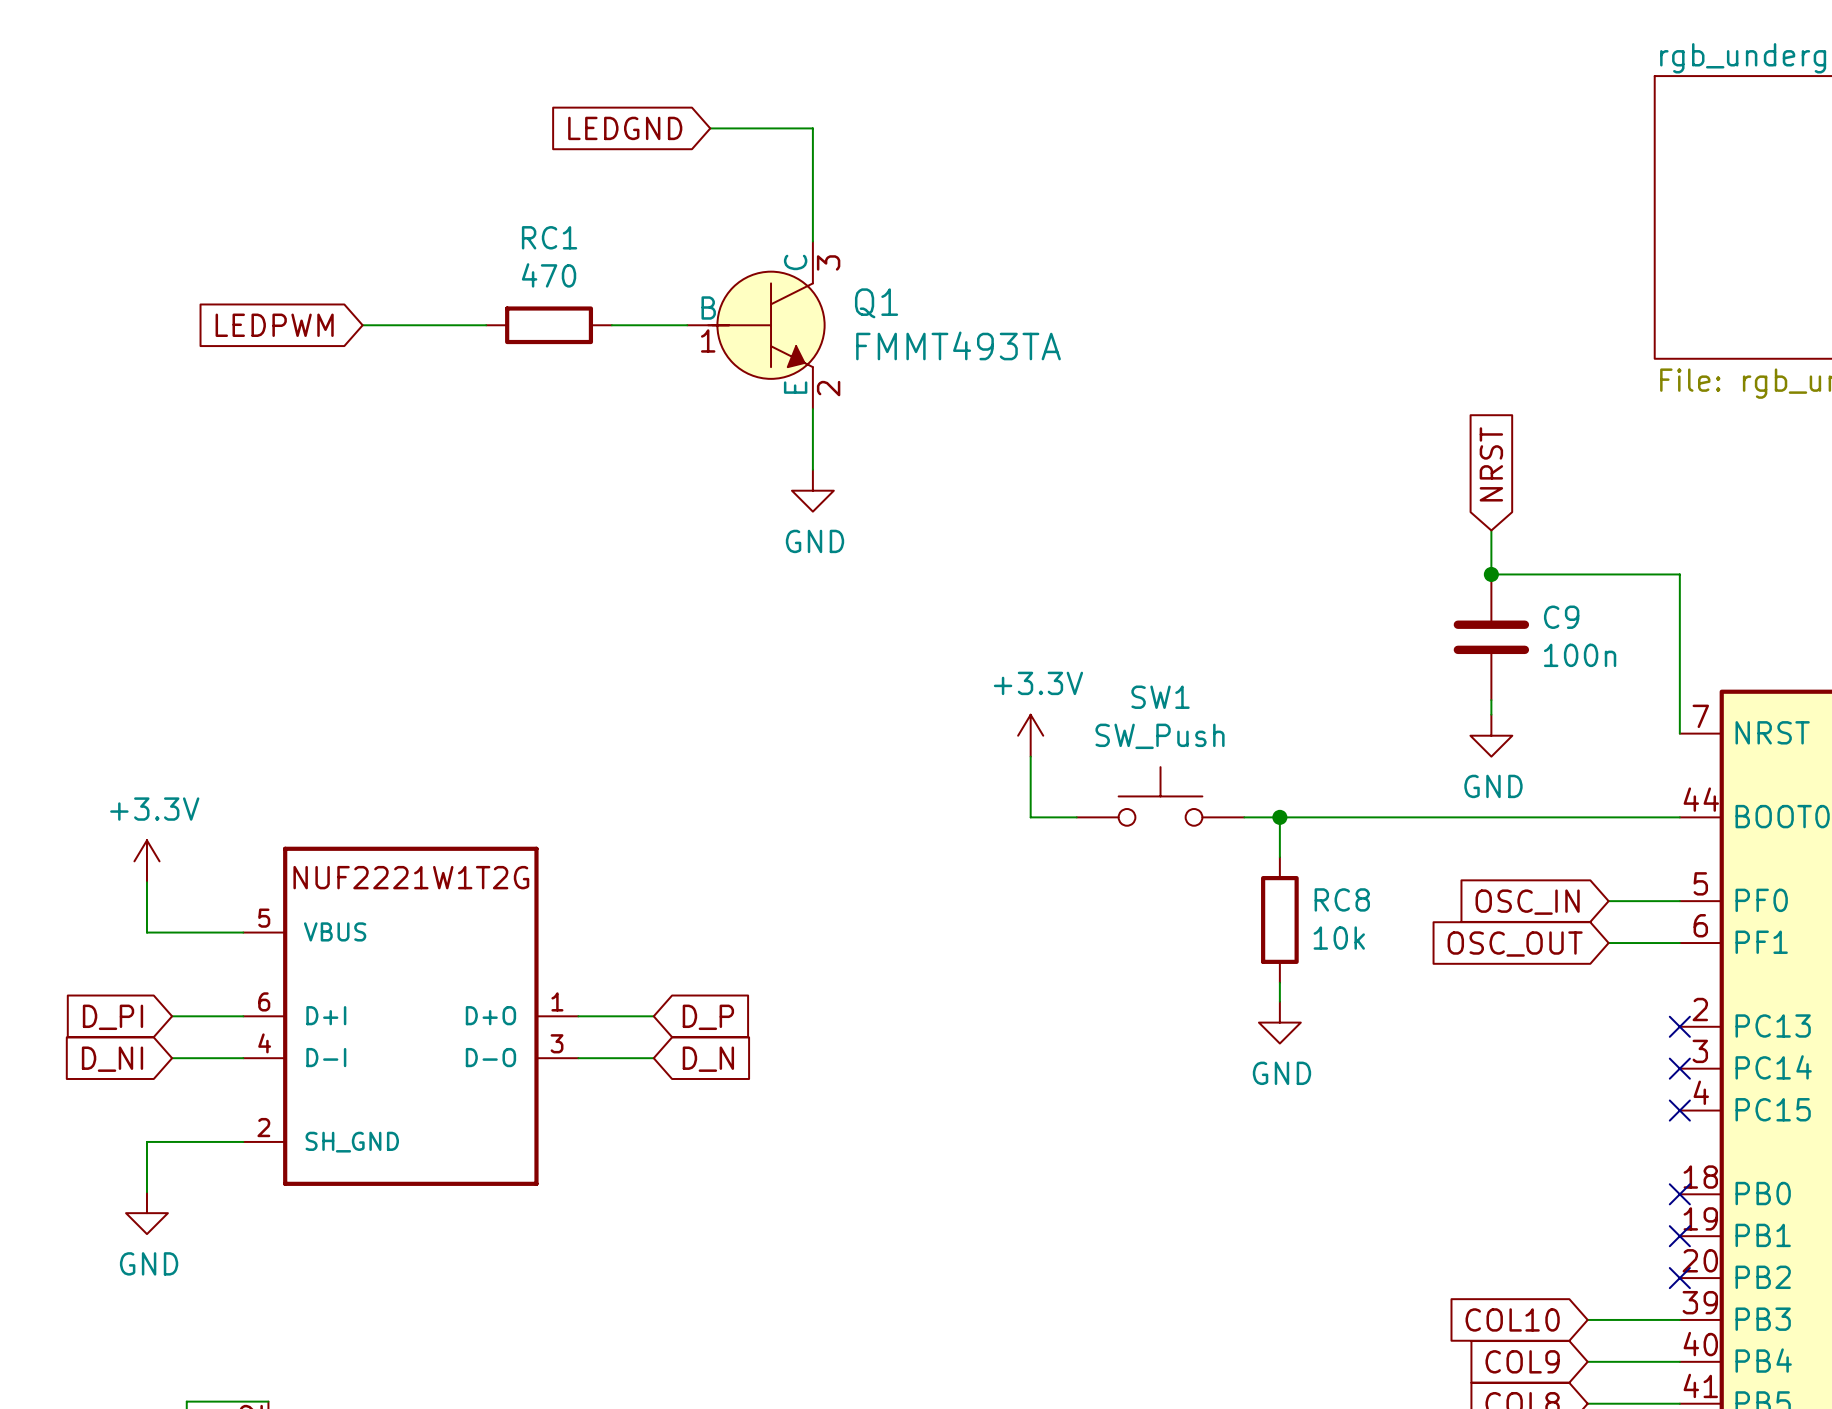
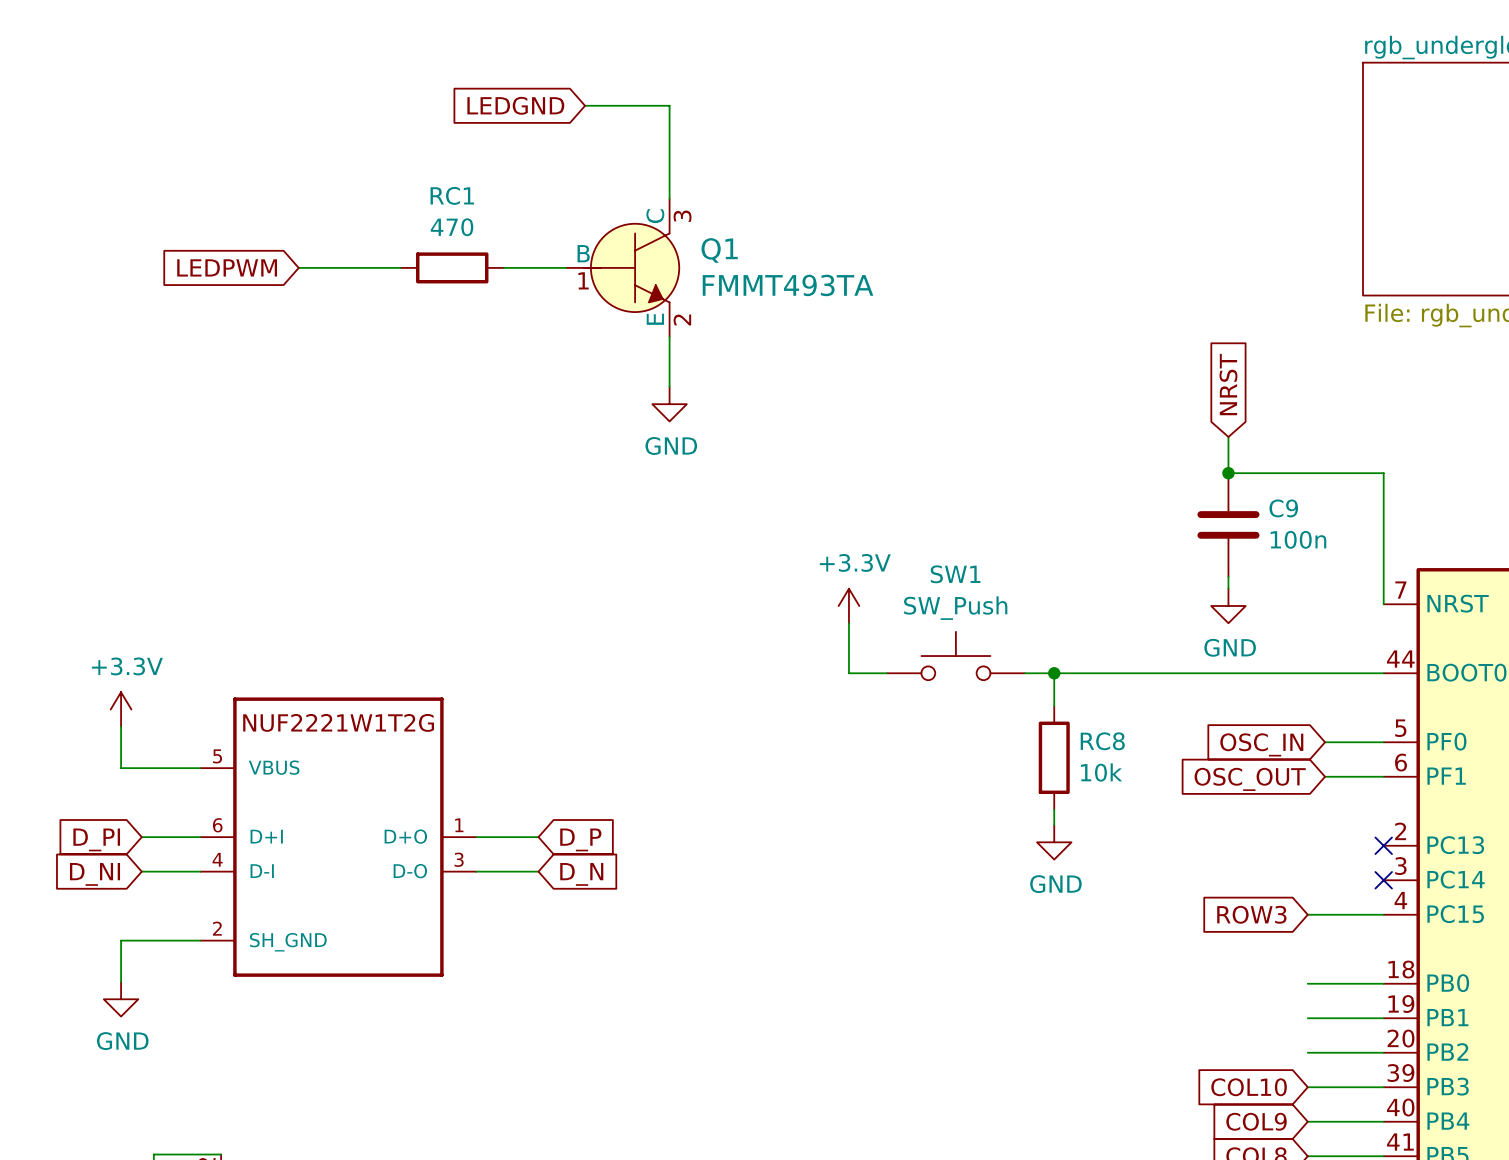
global label: none -> ROW3 (1251, 914)
wire: none -> (1307, 914) (1383, 914)
no-connect mark: (1679, 1110) -> none
wire: none -> (1307, 983) (1383, 983)
no-connect mark: (1679, 1194) -> none
wire: none -> (1307, 1018) (1383, 1018)
no-connect mark: (1679, 1236) -> none
wire: none -> (1307, 1052) (1383, 1052)
no-connect mark: (1679, 1278) -> none

